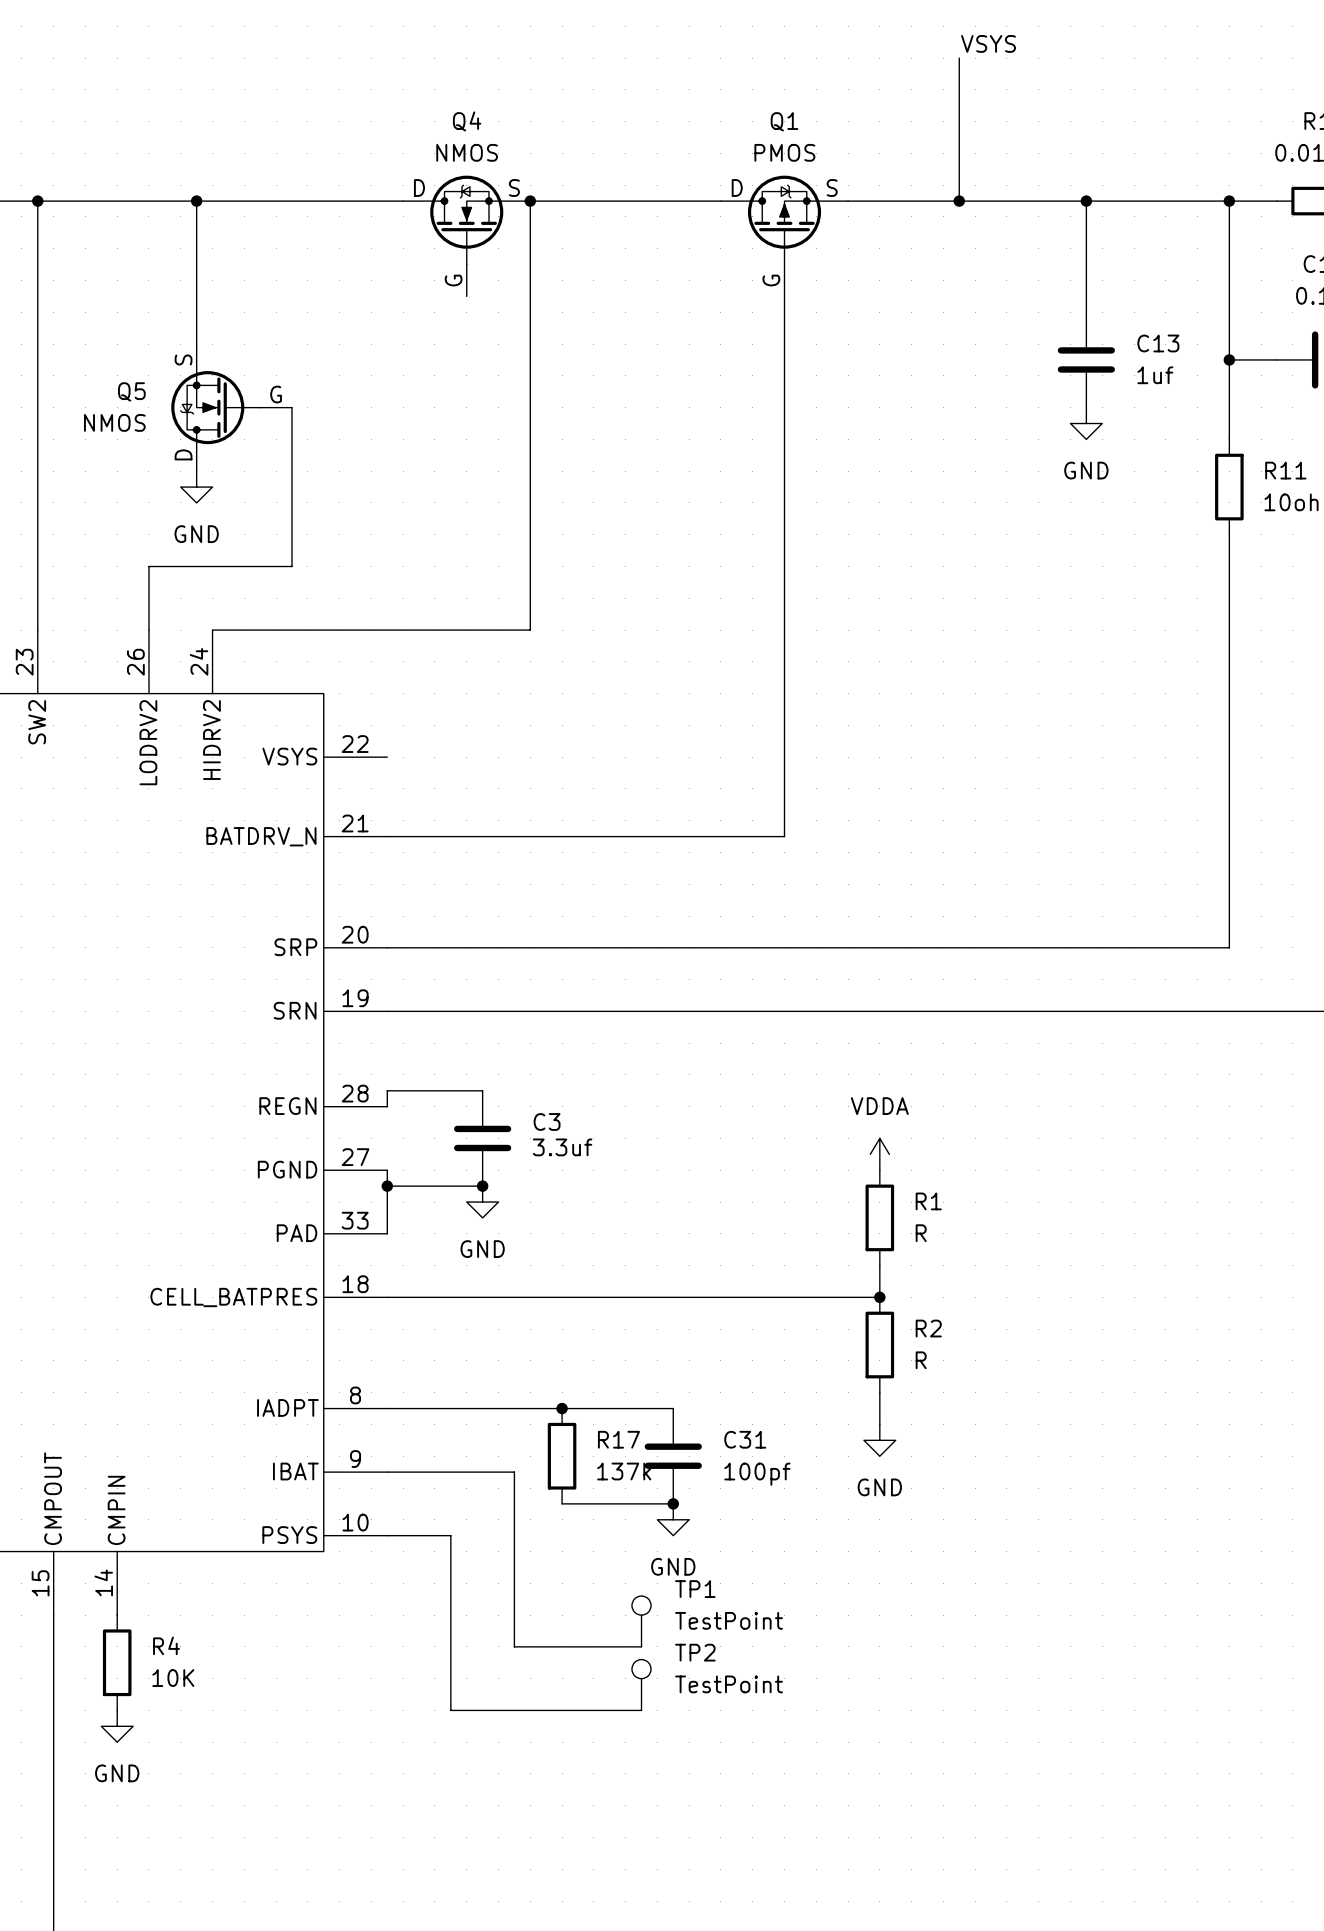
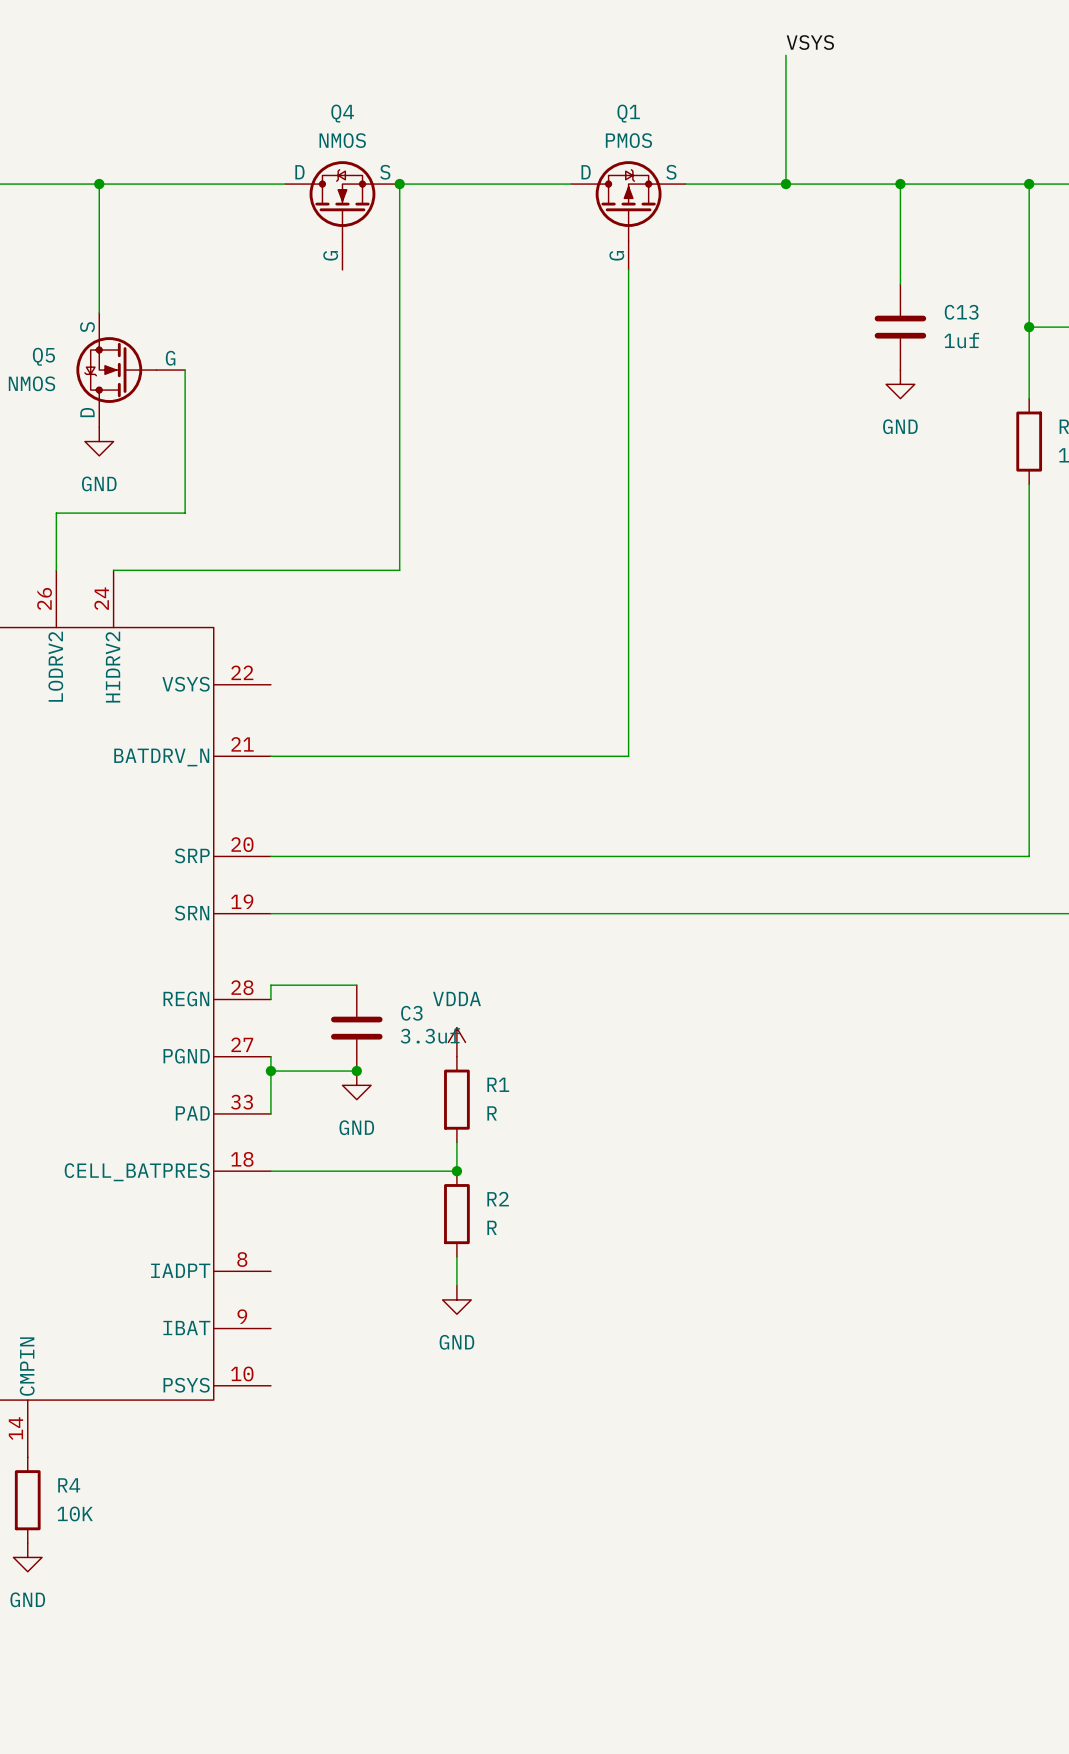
power symbol position: VDDA (879, 1154) -> VDDA (456, 1042)
R1 position: (879, 1217) -> (456, 1099)
wire: (879, 1265) (879, 1297) (593, 1297) -> (456, 1142) (456, 1171)
junction: none -> (456, 1171)
junction: (879, 1297) -> none
R2 position: (879, 1345) -> (456, 1214)
wire: (879, 1392) (879, 1424) -> (456, 1257) (456, 1285)
wire: (387, 1408) (673, 1408) -> none
junction: (562, 1408) -> none
power symbol: GND (879, 1440) -> none
R17: 137k (562, 1456) -> none
C31: 100pf (673, 1456) -> none
wire: (387, 1472) (514, 1472) (514, 1646) (641, 1646) -> none
wire: (562, 1503) (673, 1503) -> none
junction: (673, 1503) -> none
power symbol position: GND (673, 1519) -> GND (456, 1299)
wire: (387, 1535) (450, 1535) (450, 1710) (641, 1710) -> none
TP1: TestPoint (641, 1621) -> none
TP2: TestPoint (641, 1685) -> none

